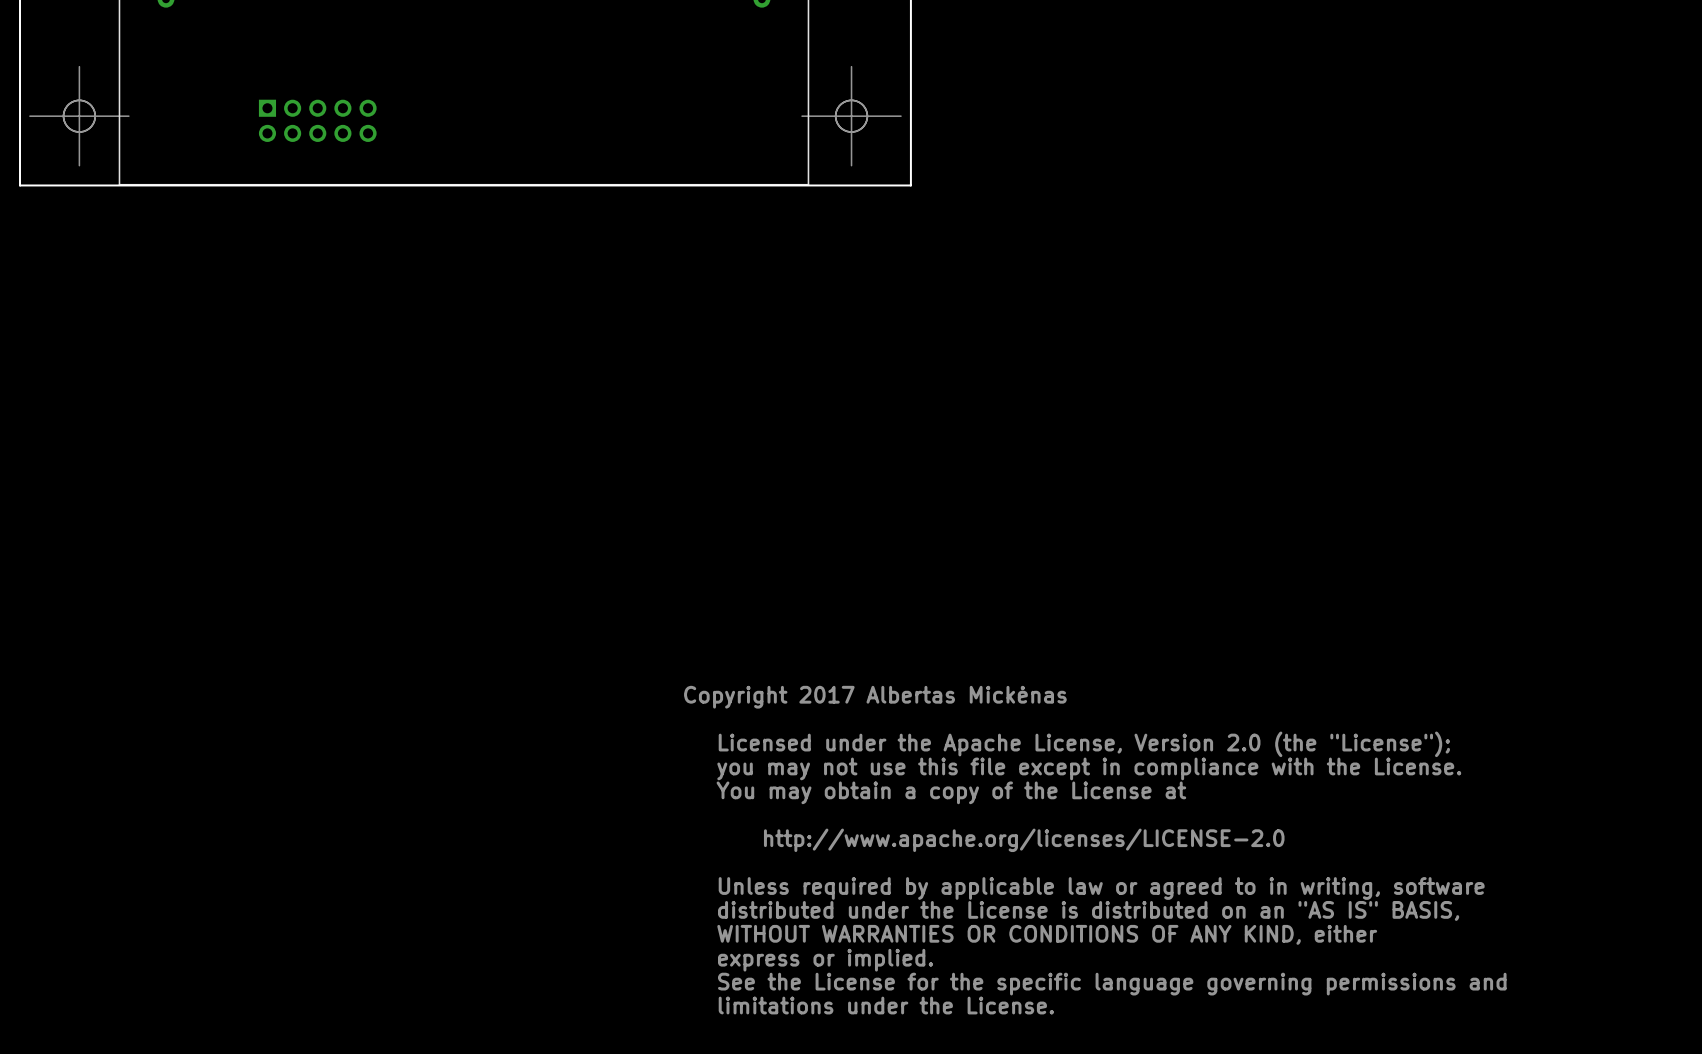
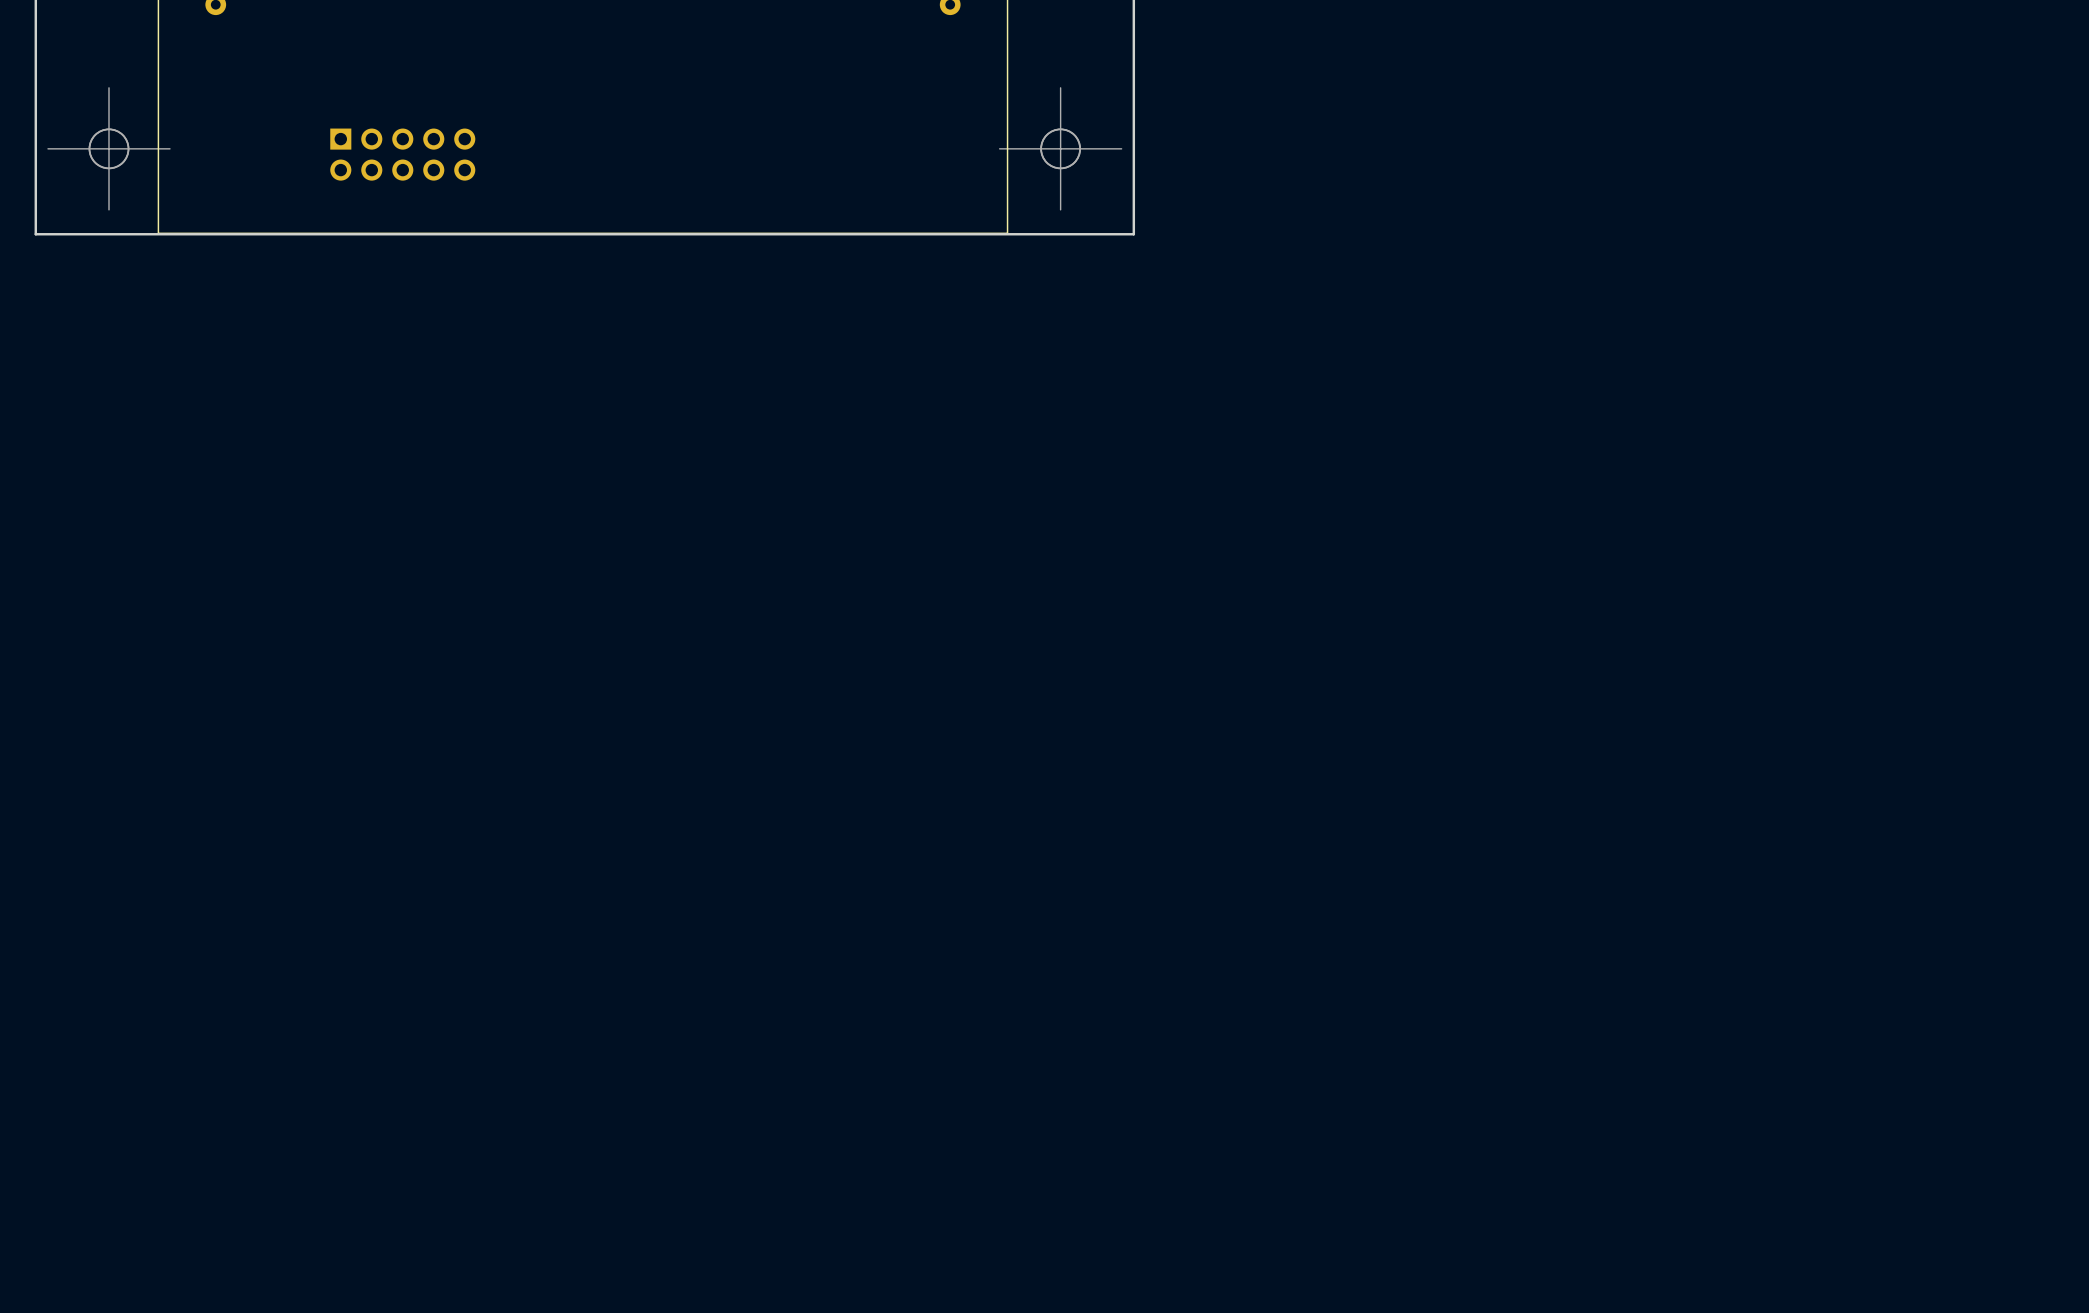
text: Copyright 2017 Albertas Mickėnas (875, 697) -> none
text: Licensed under the Apache License, Version 2.0 (the "License"); (1084, 744) -> none
text: you may not use this file except in compliance with the License. (1089, 768) -> none
text: You may obtain a copy of the License at (951, 792) -> none
text: http://www.apache.org/licenses/LICENSE-2.0 (1024, 840) -> none
text: Unless required by applicable law or agreed to in writing, software (1101, 888) -> none
text: distributed under the License is distributed on an "AS IS" BASIS, (1088, 910) -> none
text: WITHOUT WARRANTIES OR CONDITIONS OF ANY KIND, either (1047, 934) -> none
text: express or implied. (825, 960) -> none
text: See the License for the specific language governing permissions and (1112, 984) -> none
text: limitations under the License. (886, 1005) -> none

